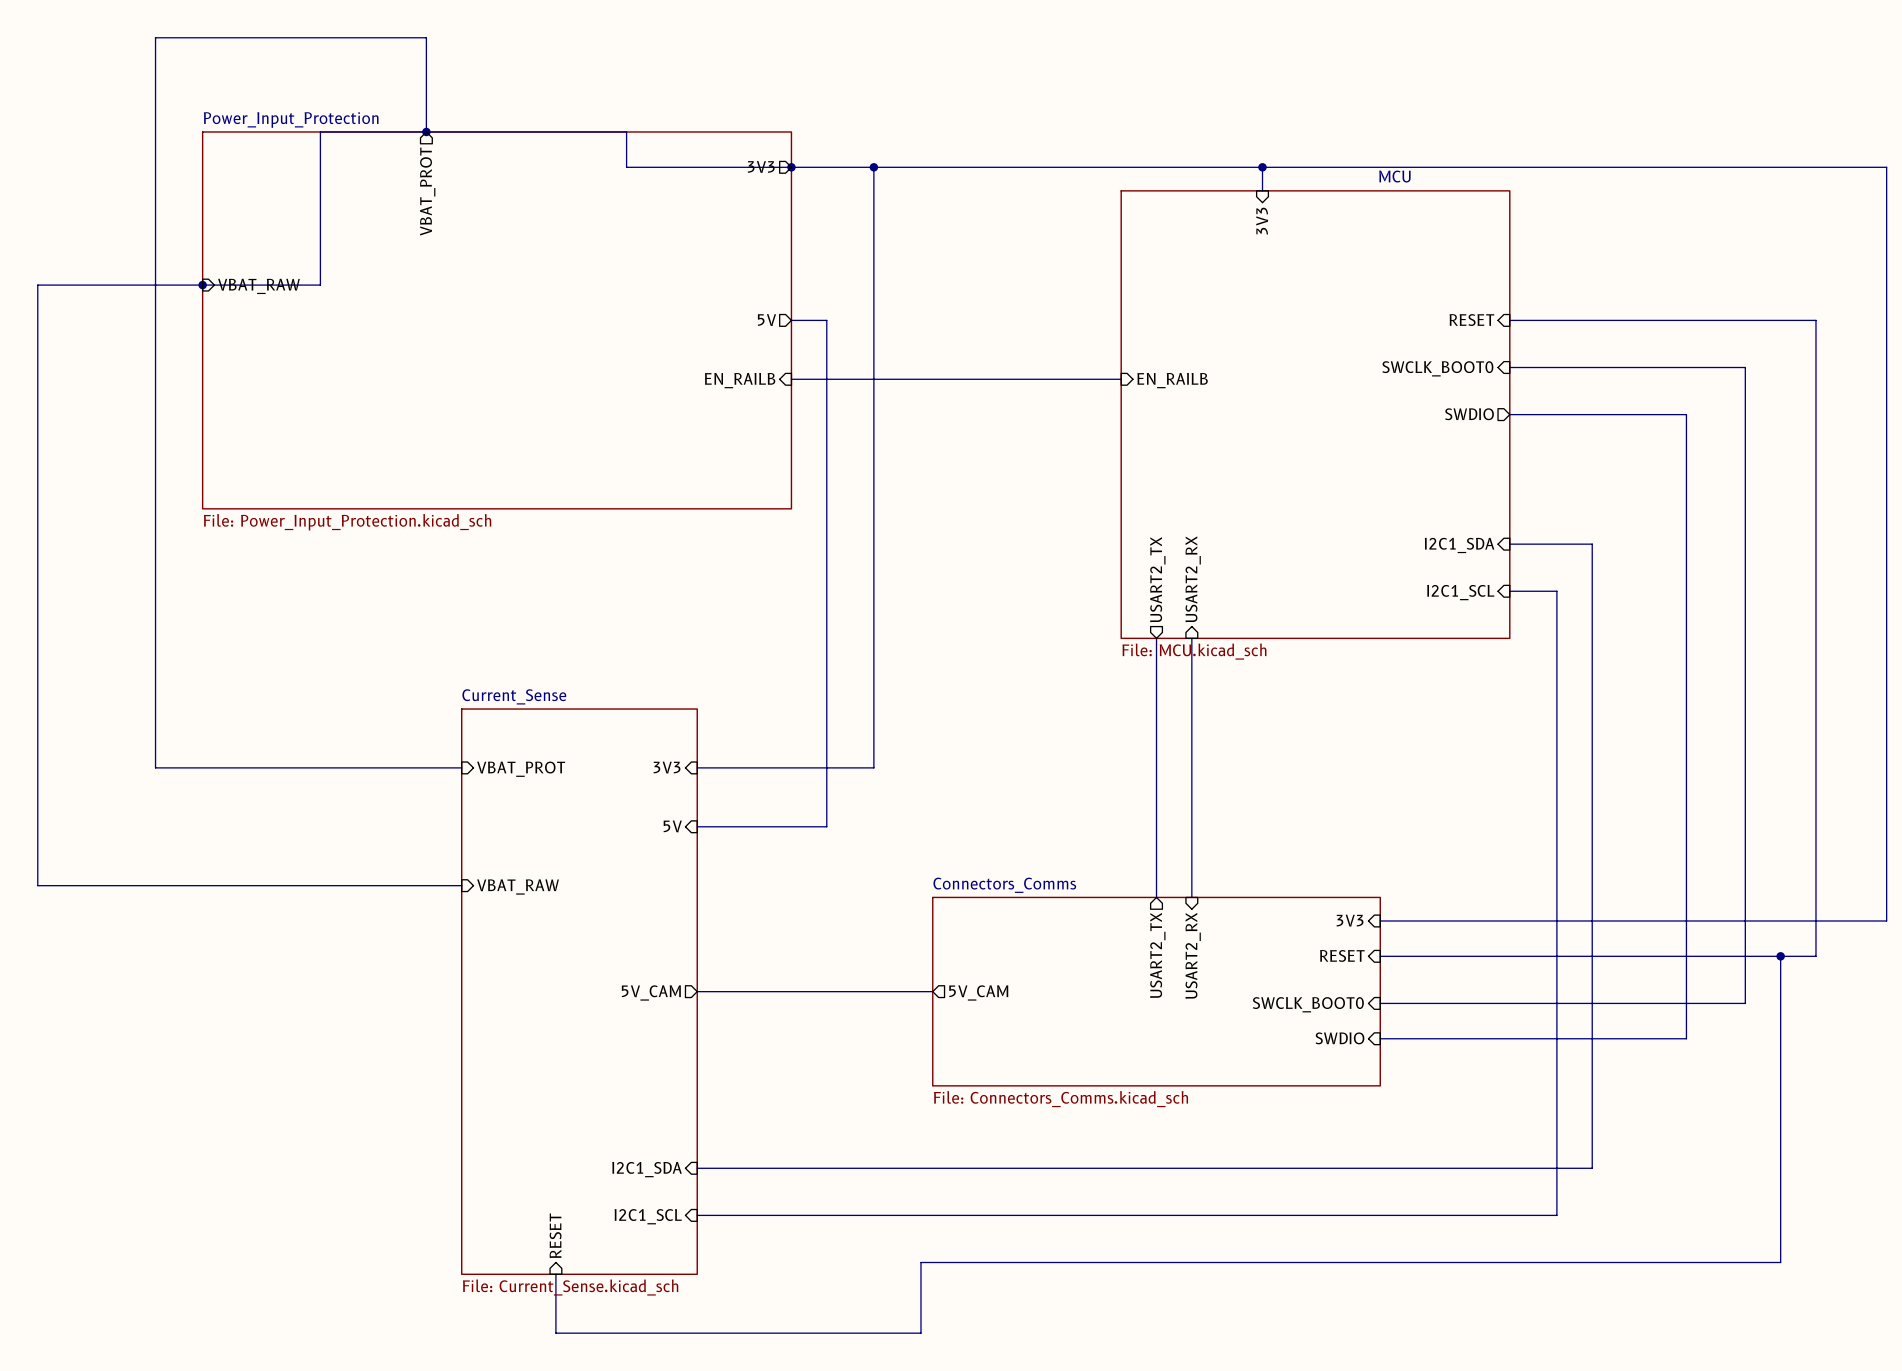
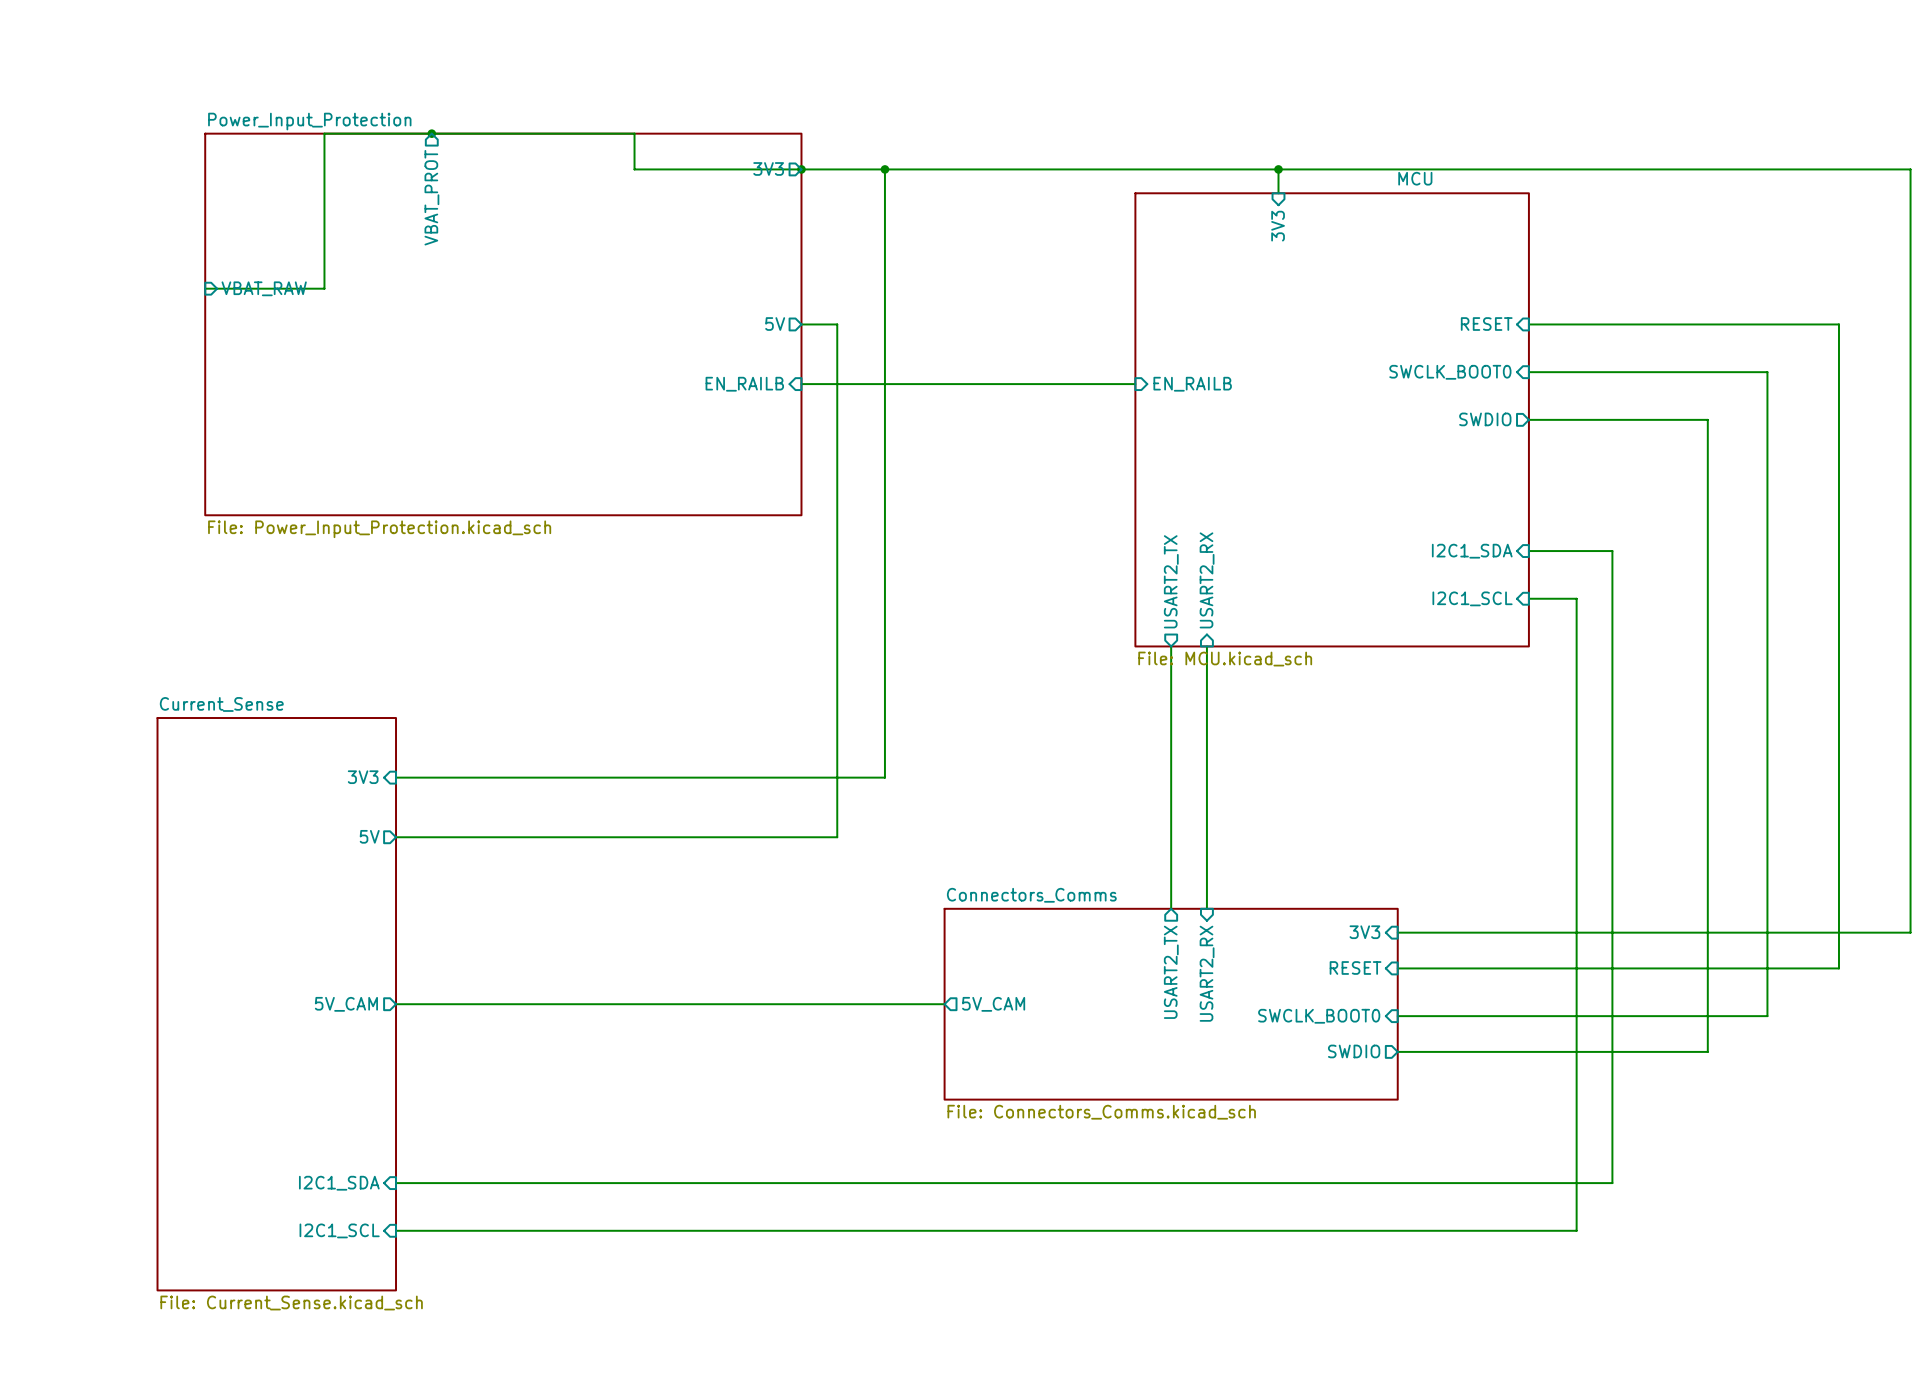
wire: (426, 131) (426, 37) (155, 37) (155, 767) (391, 767) -> none
wire: (202, 285) (37, 285) (37, 885) (461, 885) -> none
junction: (202, 285) -> none
sheet pin: none -> 3V3 (363, 777)
wire: none -> (467, 777) (706, 777)
sheet pin: 3V3 (667, 767) -> none
sheet pin: VBAT_PROT (521, 769) -> none
sheet pin: none -> 5V (369, 836)
wire: none -> (396, 837) (706, 837)
sheet pin: 5V (672, 826) -> none
sheet pin: VBAT_RAW (518, 886) -> none
wire: (1780, 956) (1780, 1262) (920, 1262) (920, 1333) (555, 1333) (555, 1274) -> none
junction: (1780, 956) -> none
sheet Current_Sense: none -> File: Current_Sense.kicad_sch (276, 1004)
wire: none -> (396, 1004) (706, 1004)
sheet Current_Sense: File: Current_Sense.kicad_sch (579, 991) -> none
sheet pin: none -> 5V_CAM (346, 1004)
sheet pin: 5V_CAM (651, 992) -> none
sheet pin shape: input (1339, 1038) -> output (1354, 1051)
wire: none -> (396, 1183) (706, 1183)
sheet pin: none -> I2C1_SDA (339, 1183)
sheet pin: I2C1_SDA (647, 1169) -> none
wire: none -> (396, 1230) (706, 1230)
sheet pin: none -> I2C1_SCL (339, 1230)
sheet pin: I2C1_SCL (648, 1216) -> none
sheet pin: RESET (555, 1235) -> none

